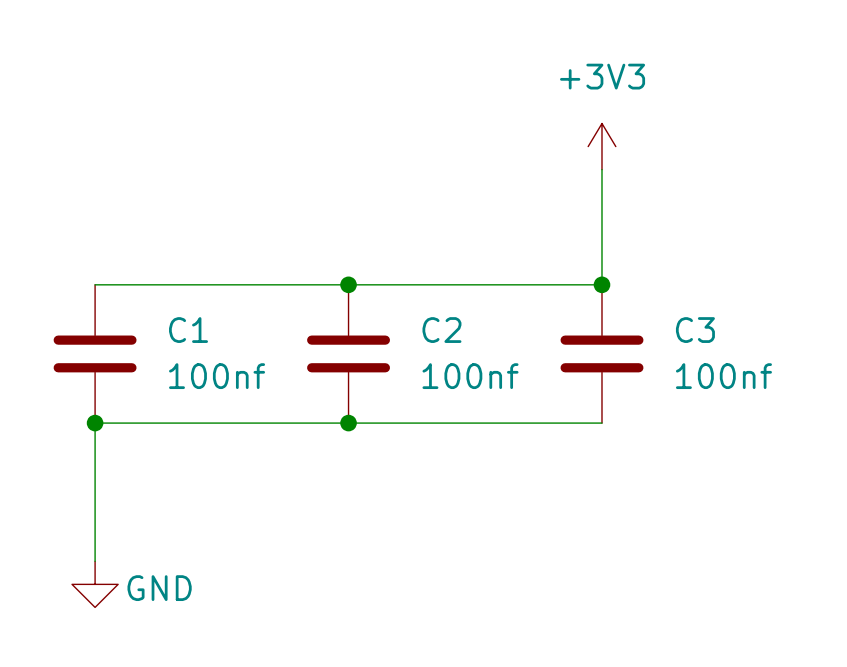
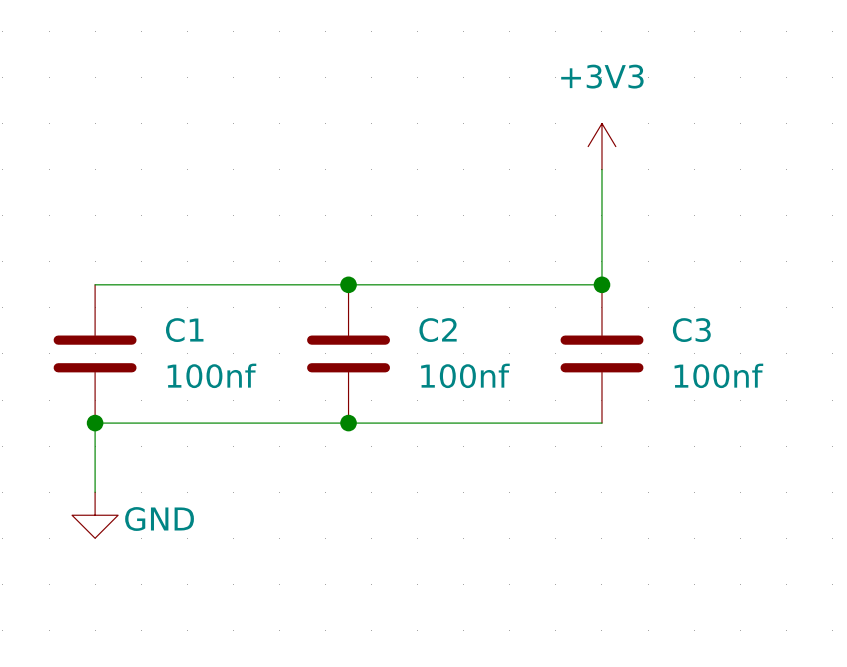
wire: (95, 492) (95, 561) -> none
power symbol position: GND (95, 584) -> GND (95, 515)

